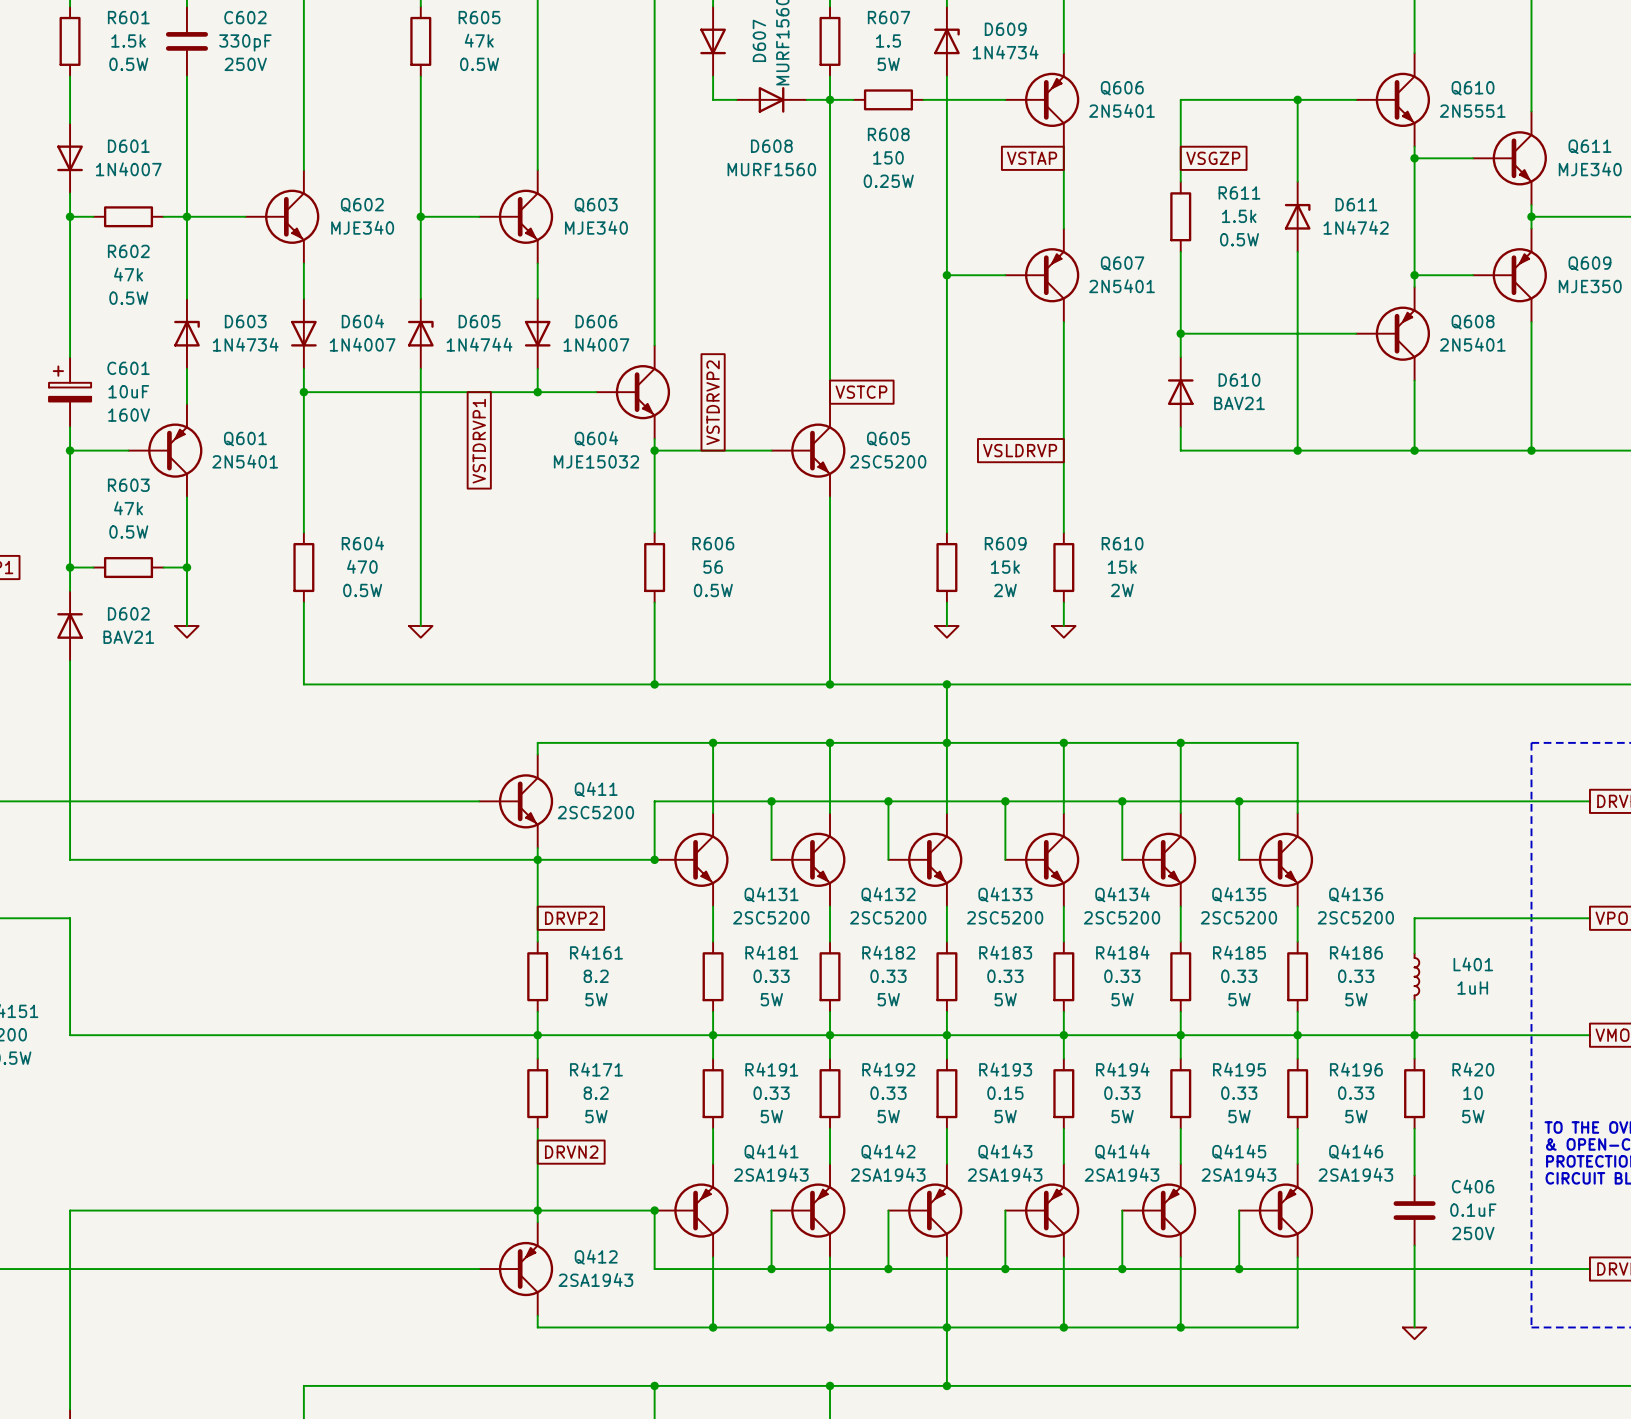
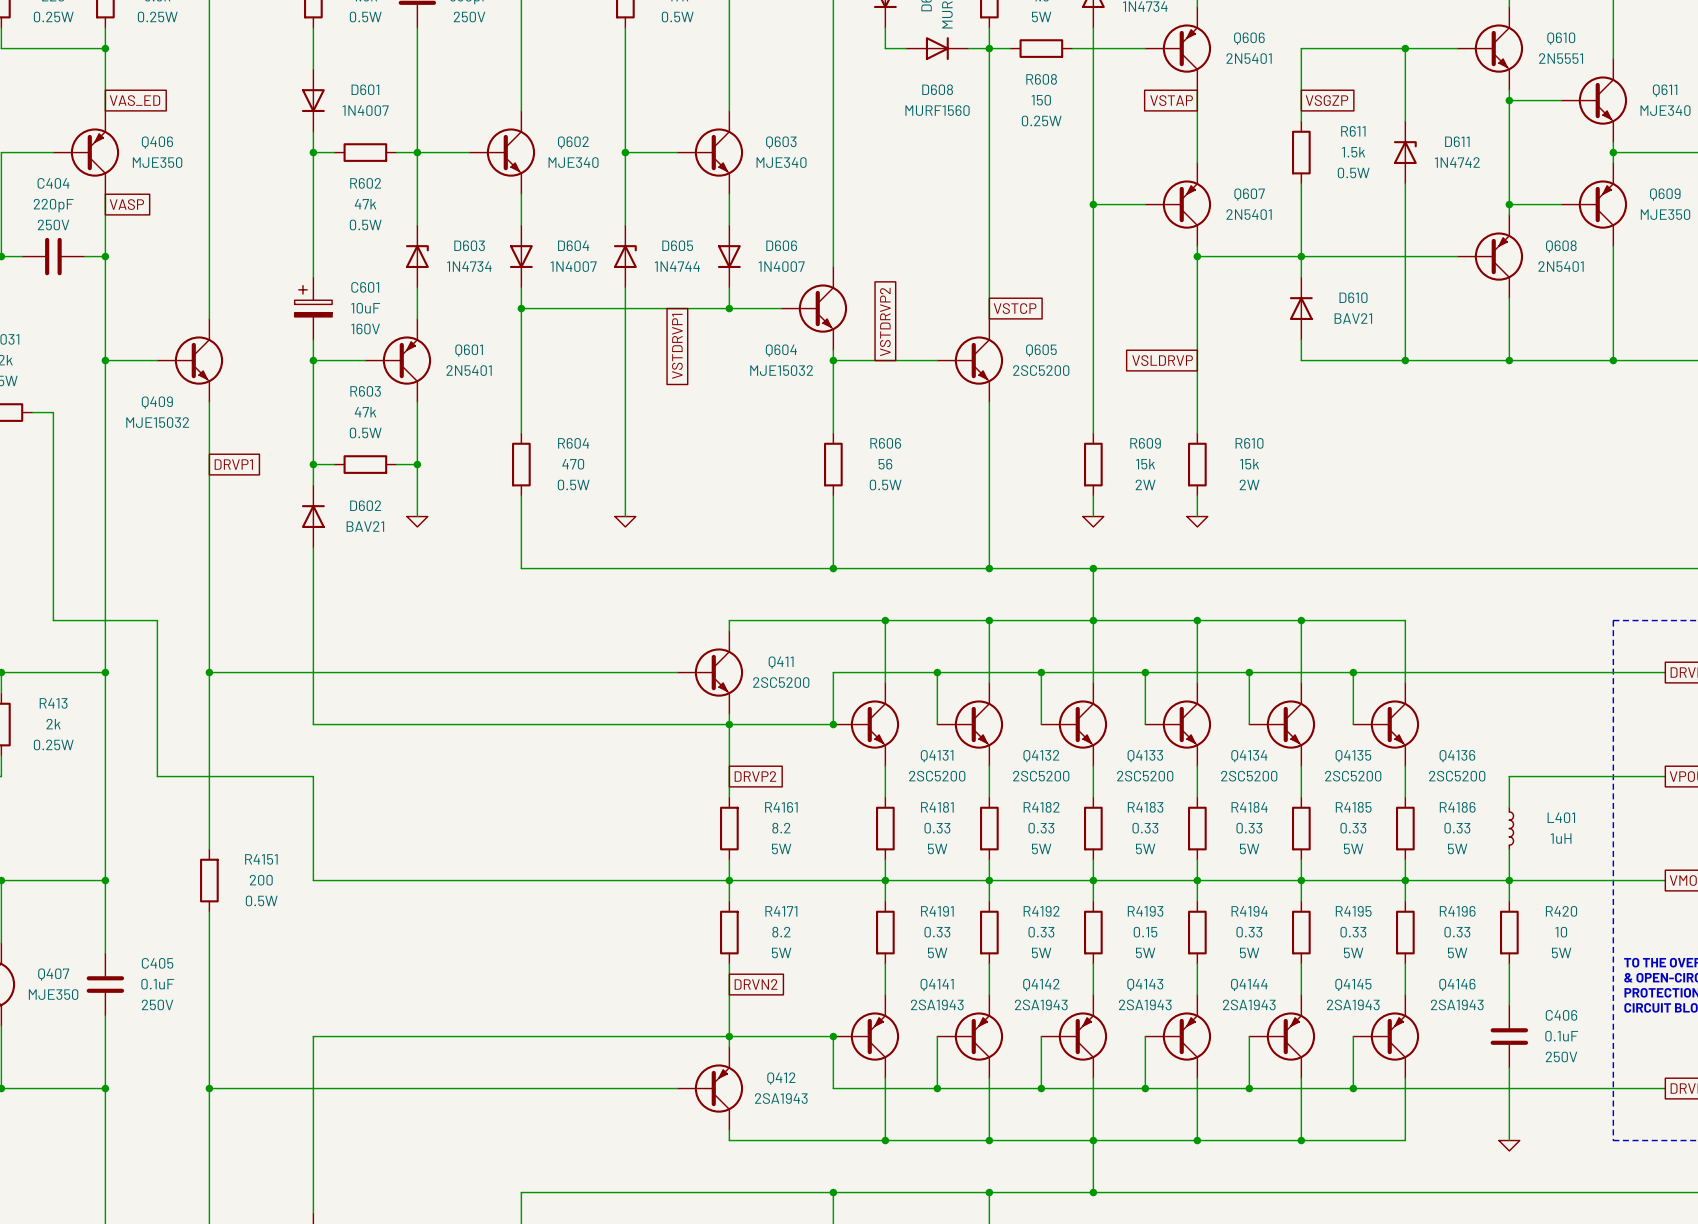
wire: none -> (1197, 256) (1301, 256)
junction: none -> (1197, 256)

